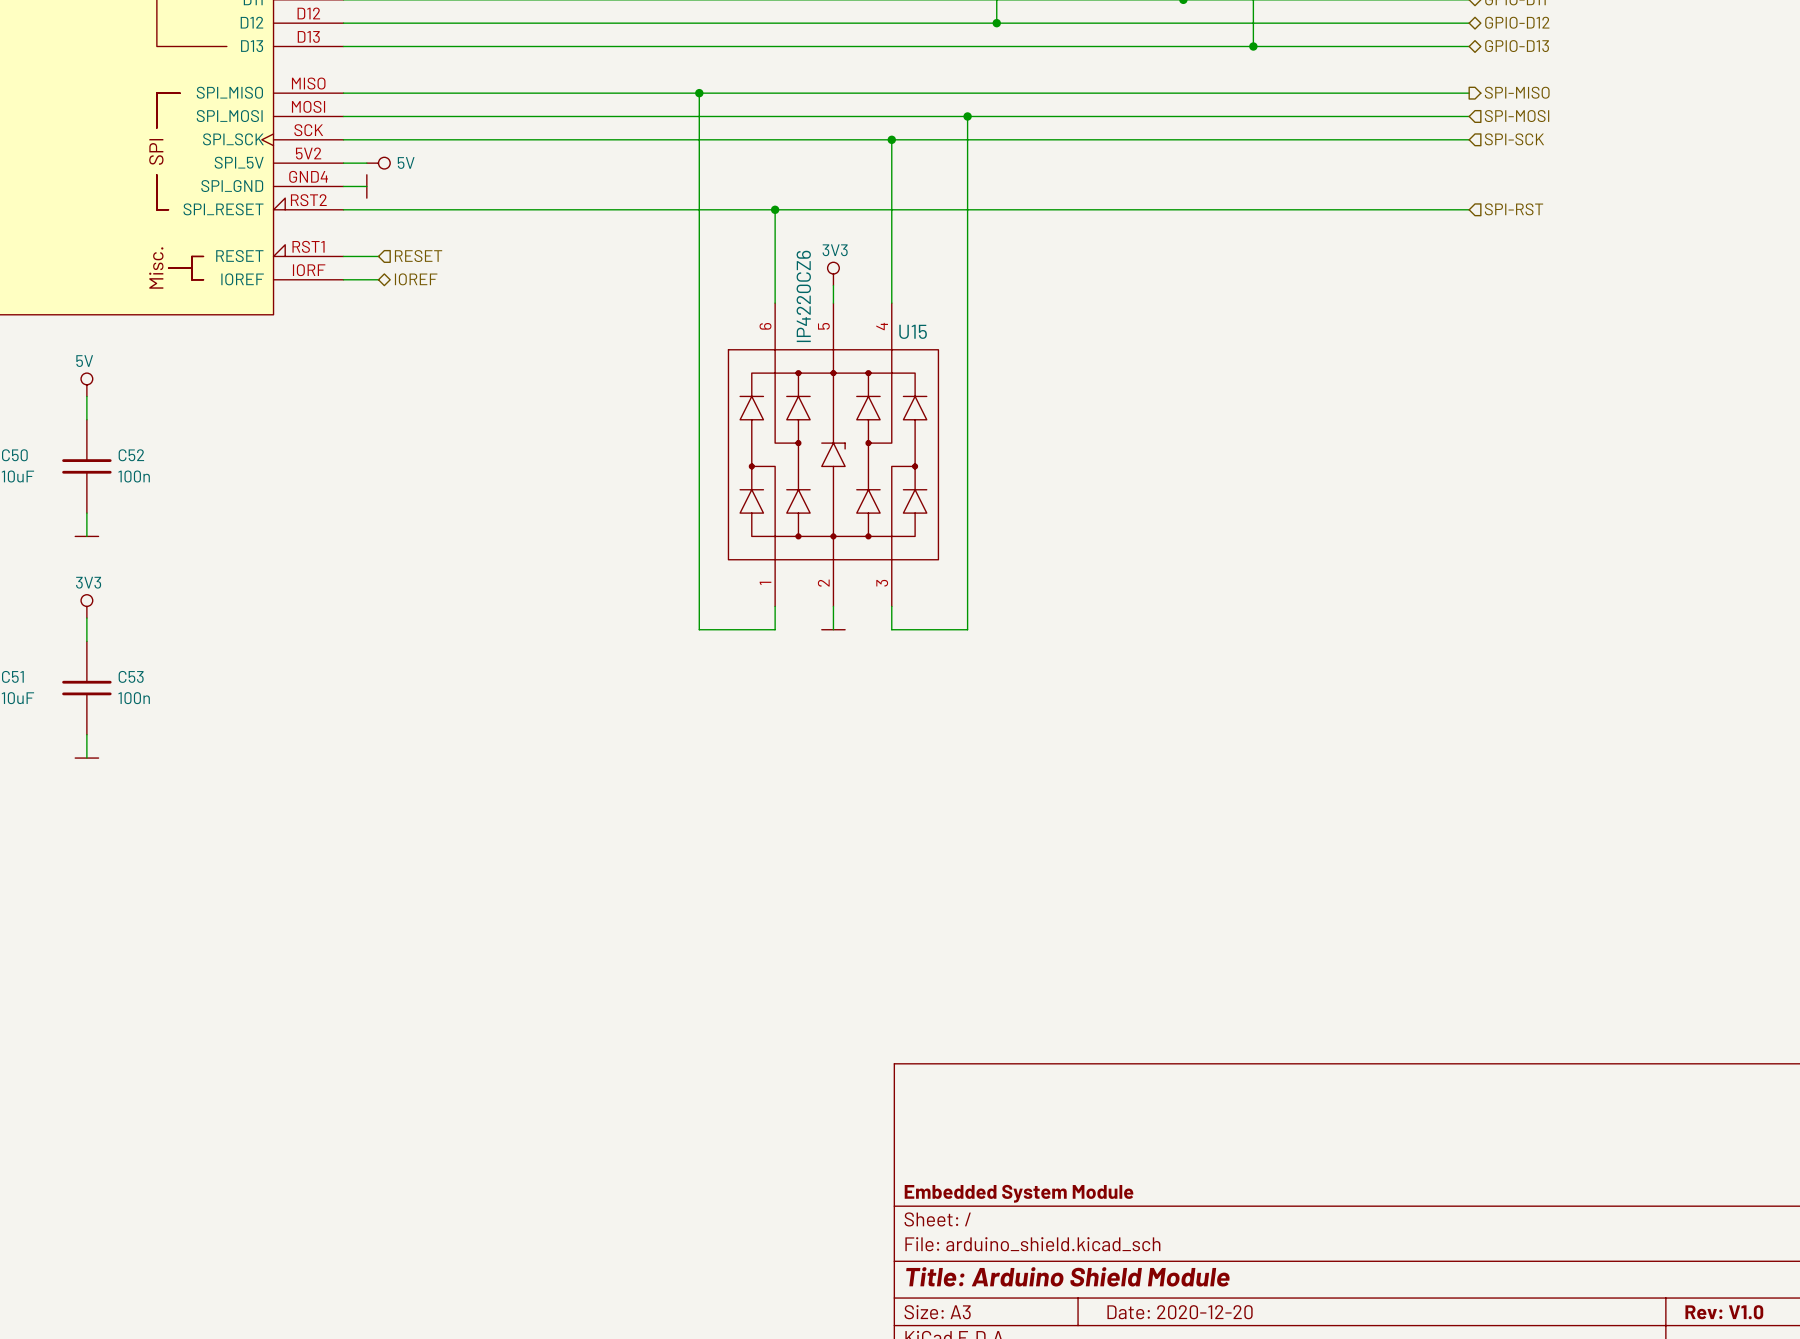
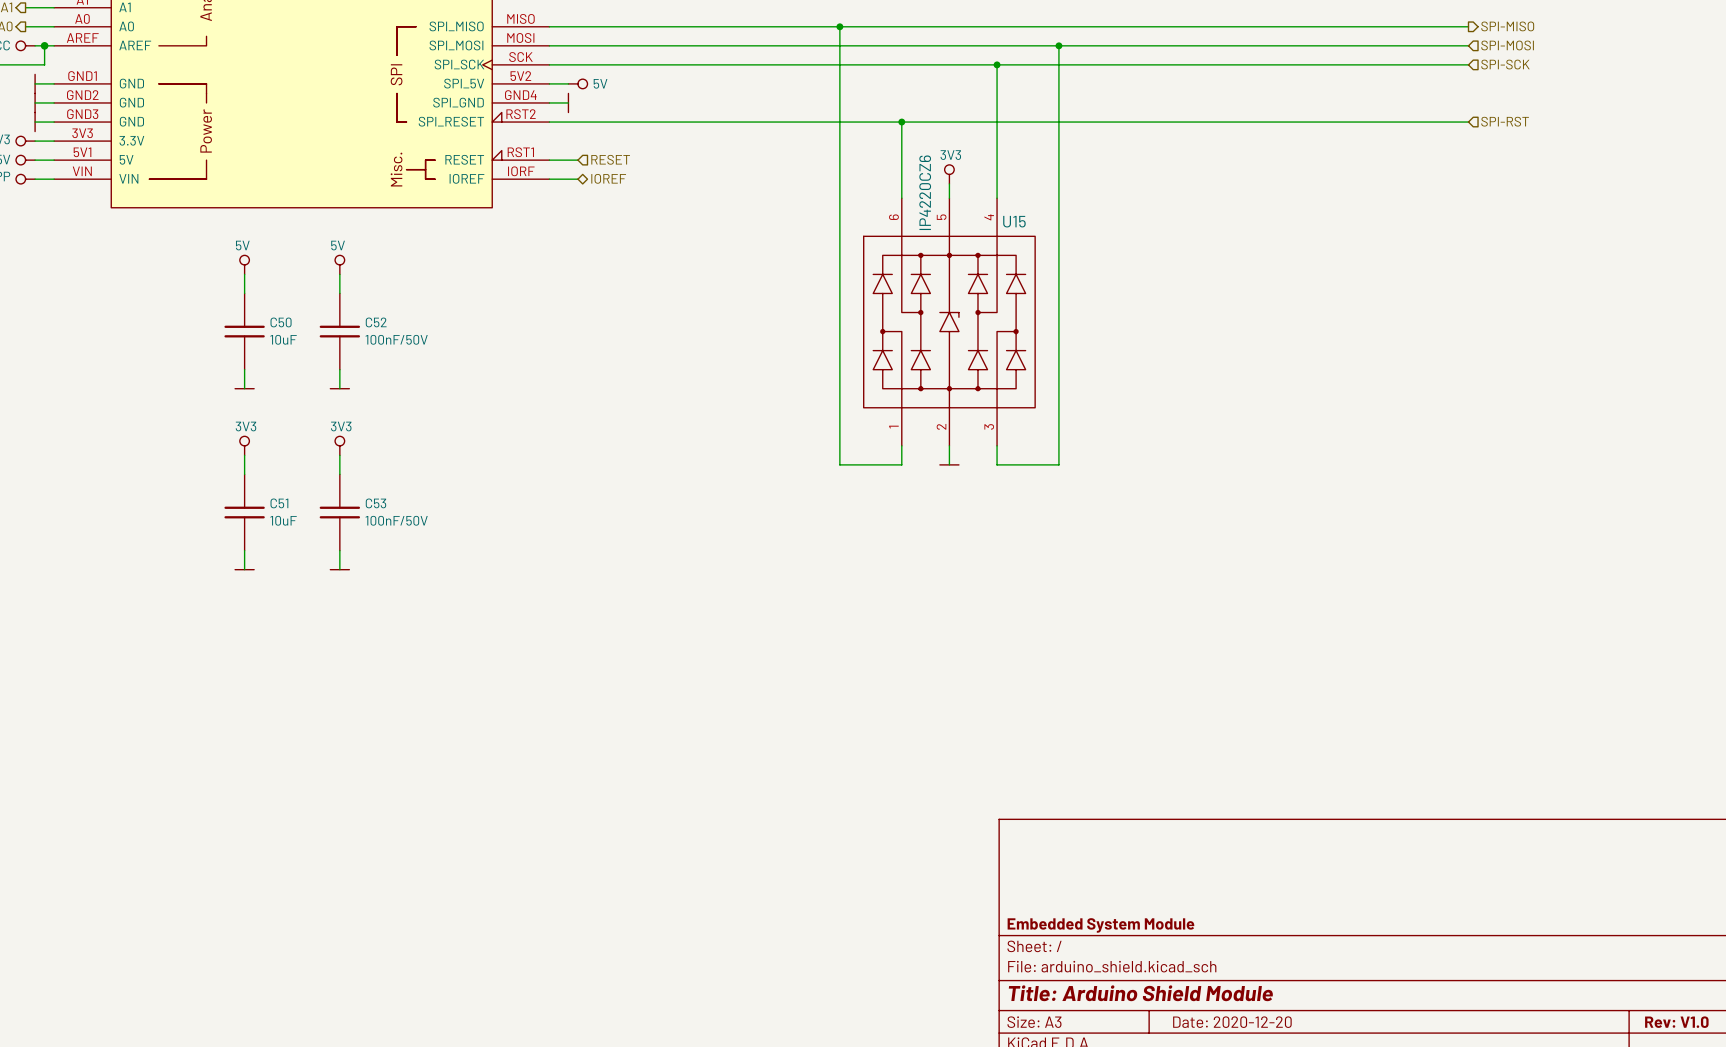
C52 value: 100n (134, 476) -> 100nF/50V (396, 339)
C53 value: 100n (134, 698) -> 100nF/50V (396, 520)

